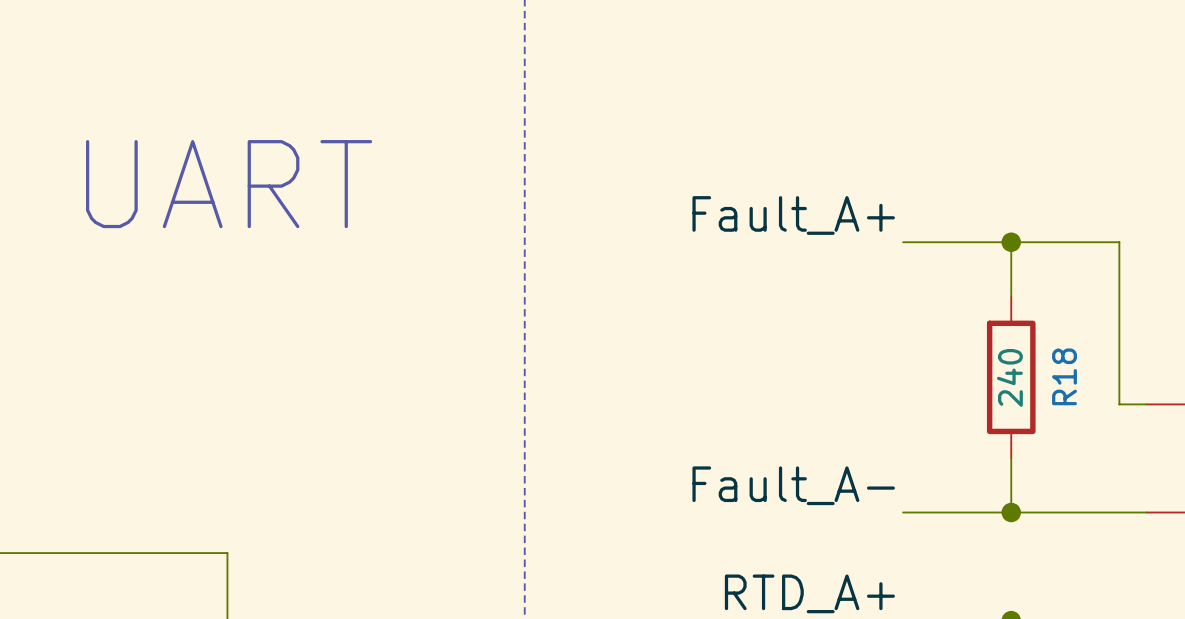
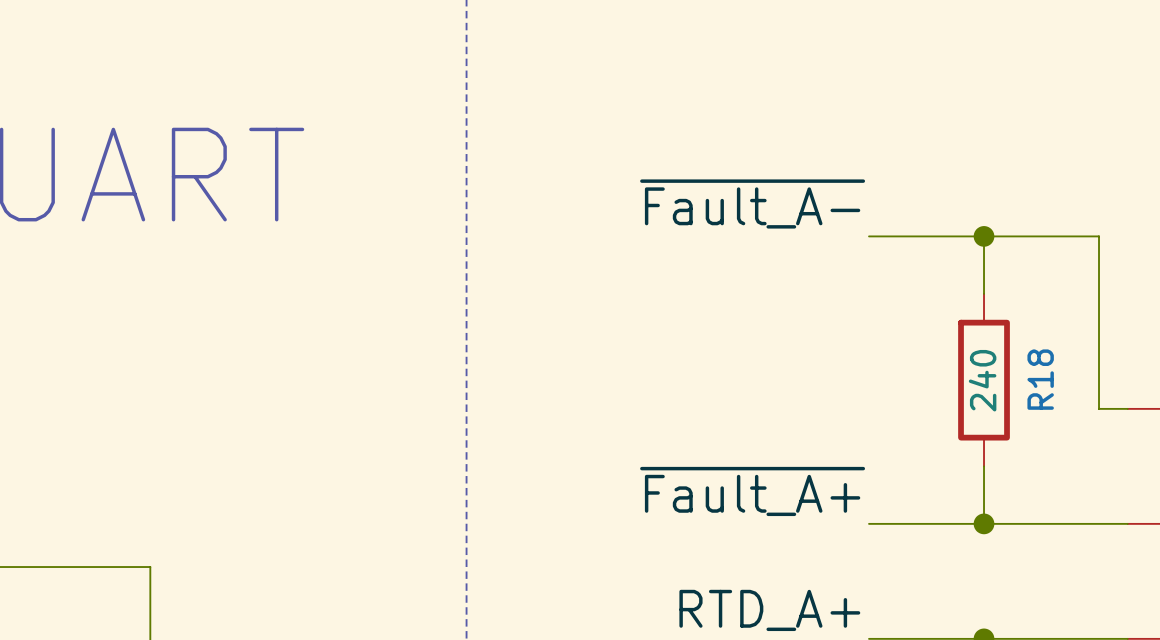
label: Fault_A+ (793, 215) -> ~{Fault_A-} (752, 203)
label: Fault_A- (793, 485) -> ~{Fault_A+} (752, 491)

